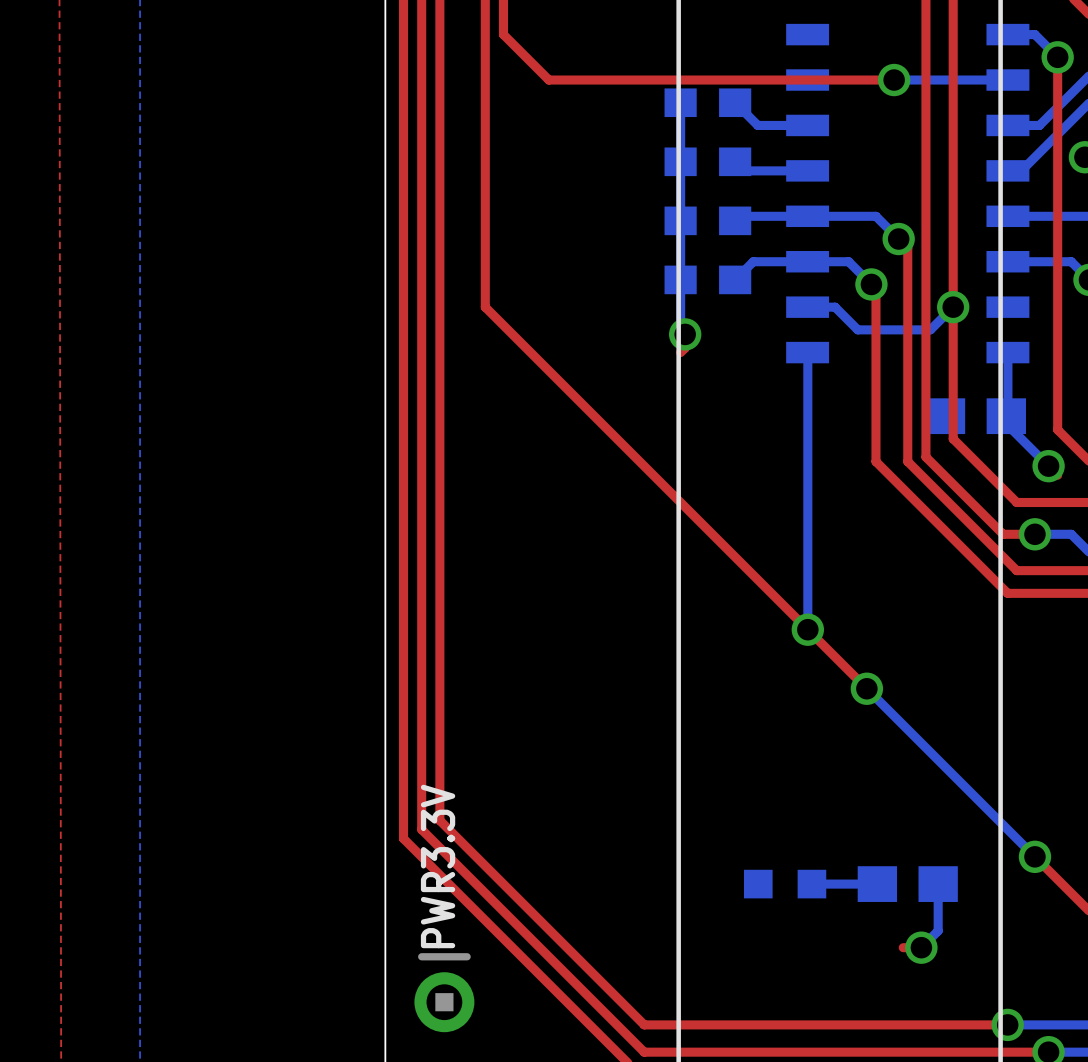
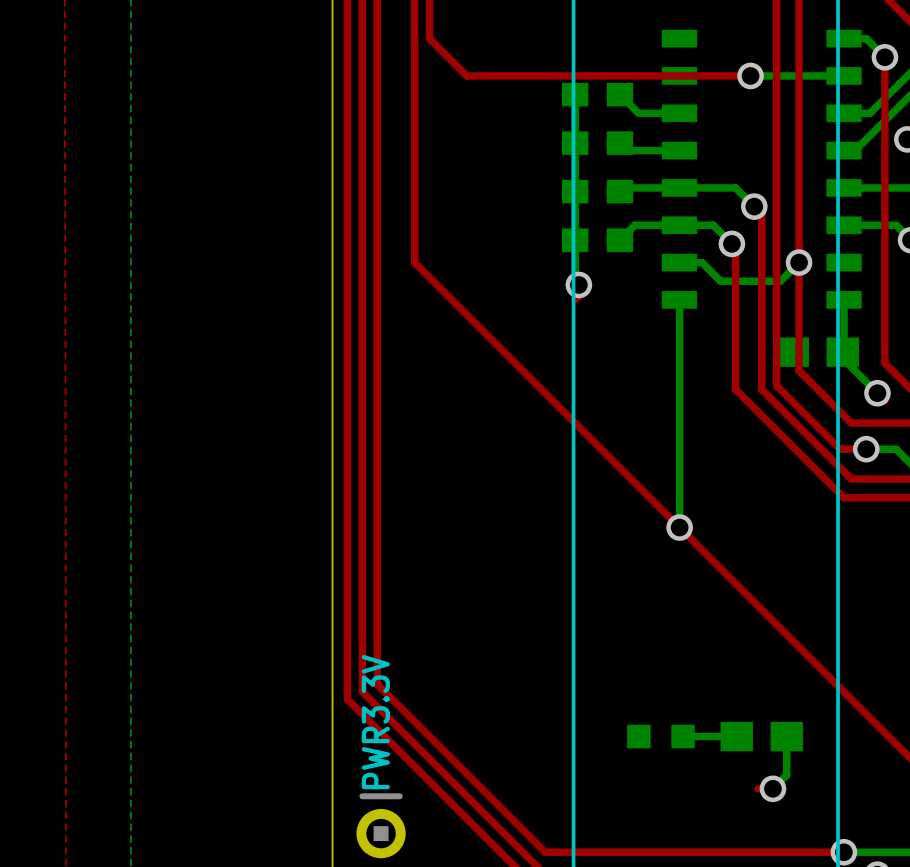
bottom track: (866, 688) (1034, 856) -> none
top track: none -> (728, 576) (866, 714)
via: (866, 688) -> none
via: (1034, 856) -> none

